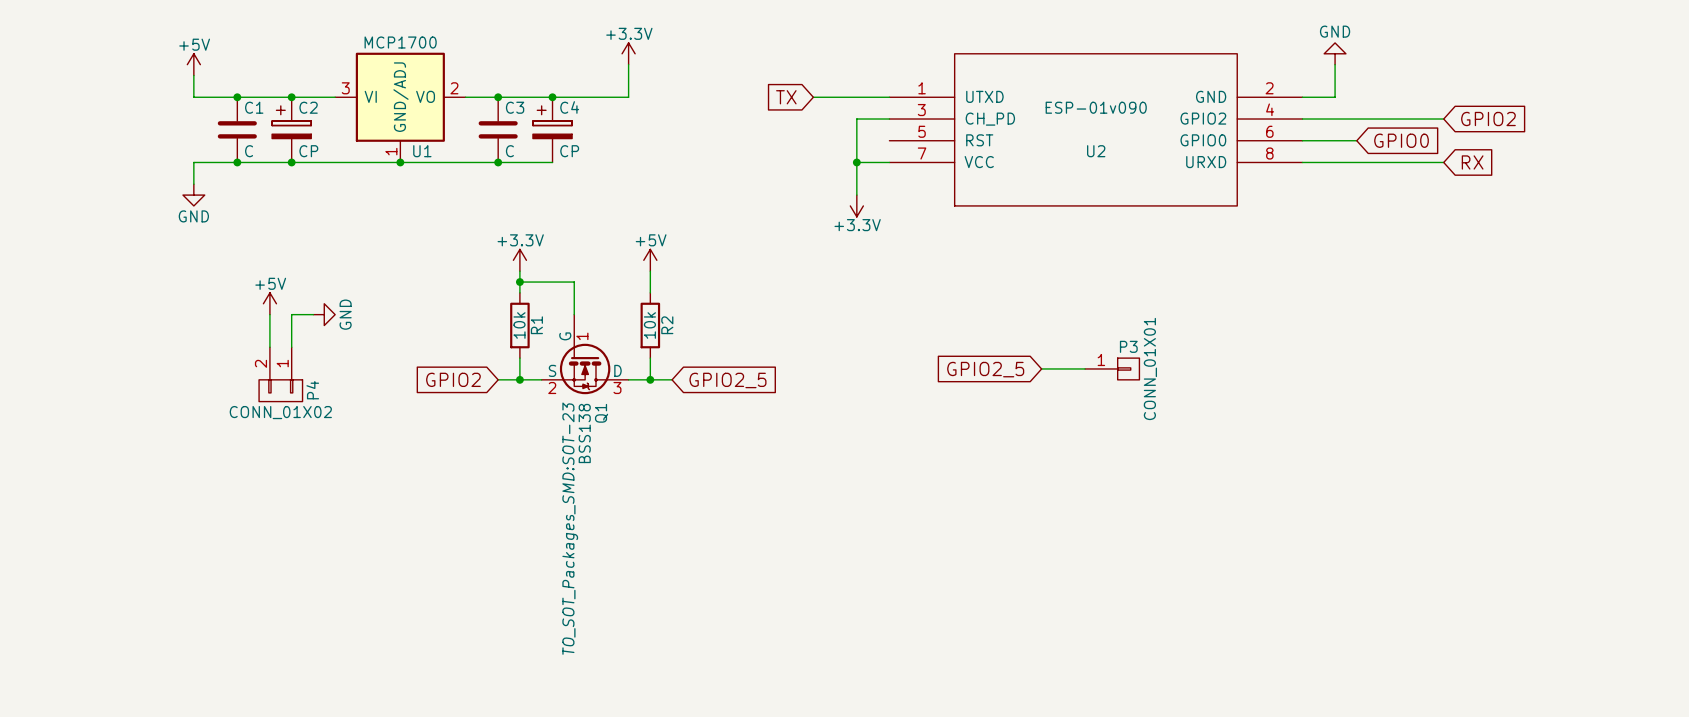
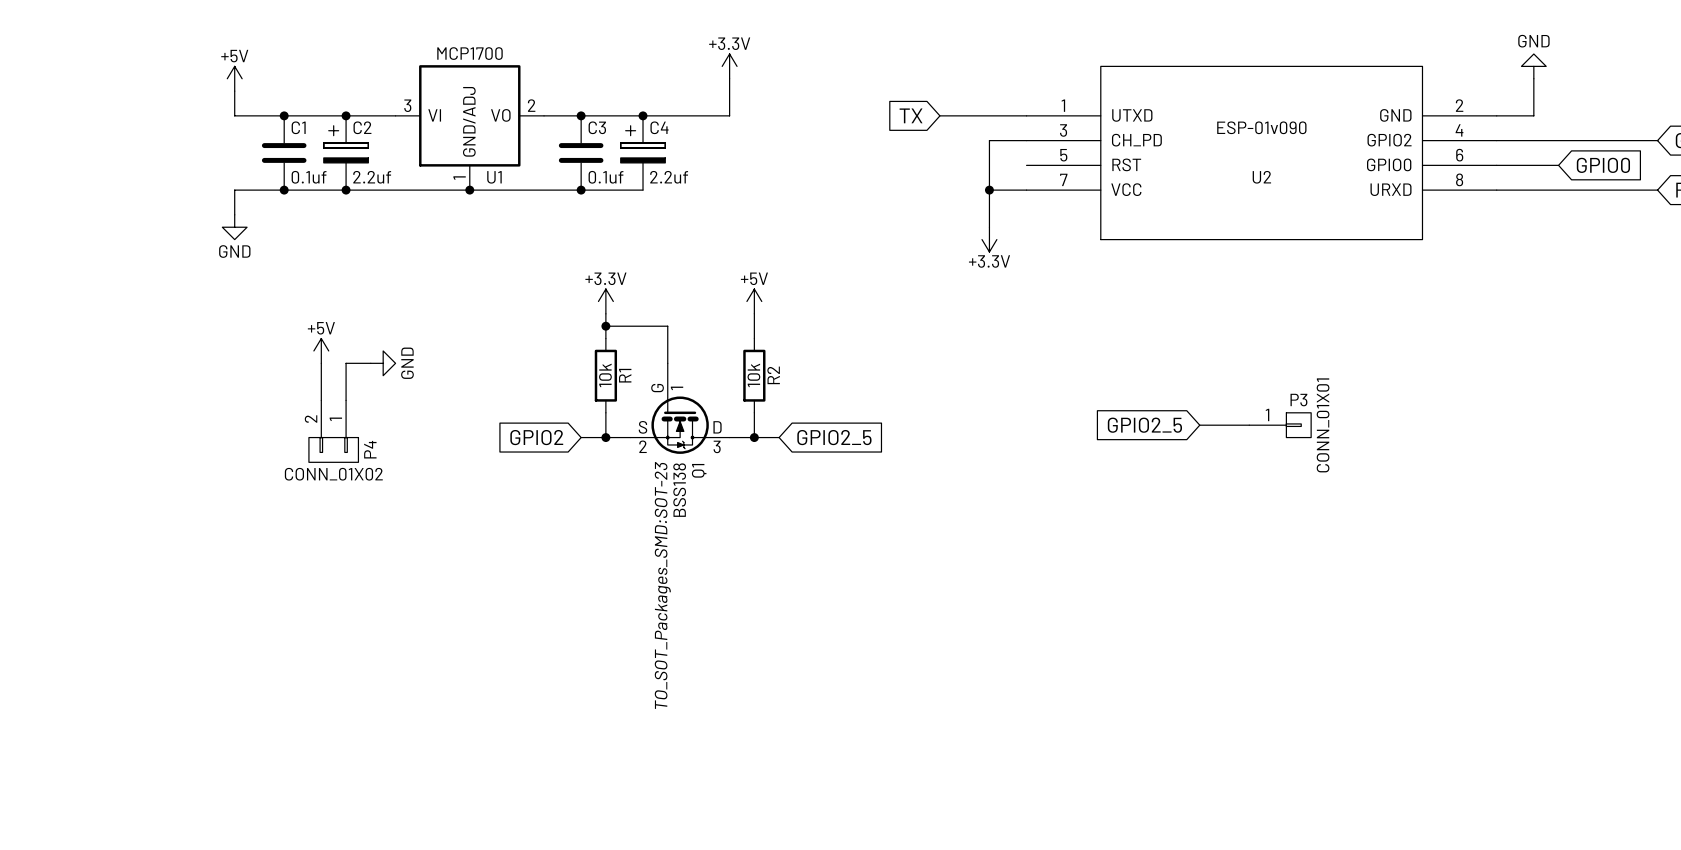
C1 value: C (249, 151) -> 0.1uf (309, 177)
C2 value: CP (308, 151) -> 2.2uf (372, 177)
C3 value: C (509, 151) -> 0.1uf (606, 177)
C4 value: CP (569, 151) -> 2.2uf (669, 177)

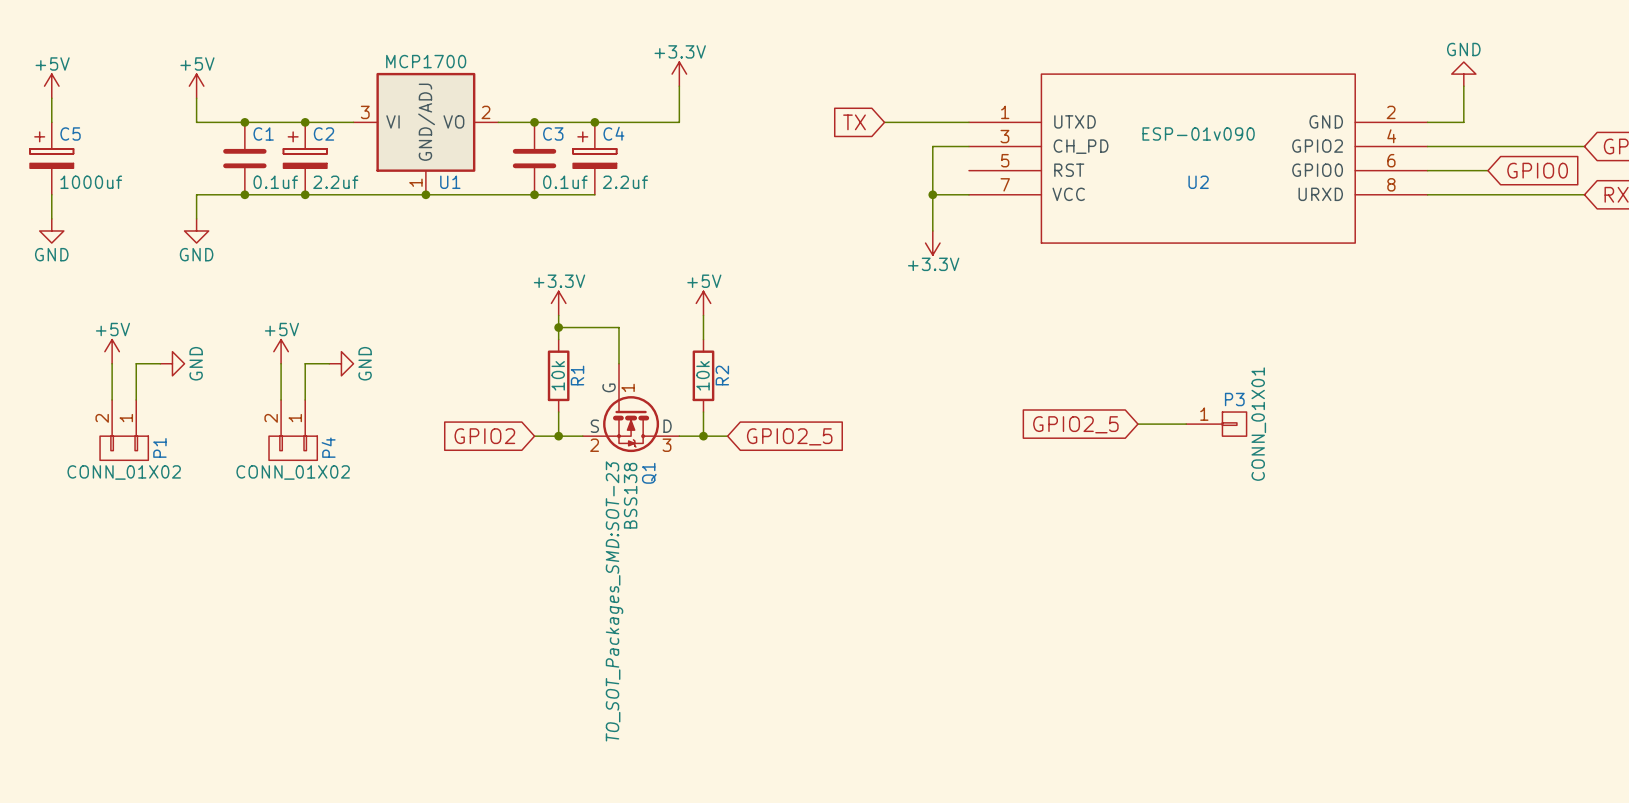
power symbol: none -> +5V (51, 86)
wire: none -> (51, 98) (51, 122)
C5: none -> 1000uf (51, 158)
wire: none -> (51, 194) (51, 218)
power symbol: none -> GND (51, 230)
power symbol: none -> +5V (112, 351)
wire: none -> (112, 363) (112, 399)
wire: none -> (160, 363) (136, 363) (136, 399)
power symbol: none -> GND (172, 363)
P1: none -> CONN_01X02 (124, 430)

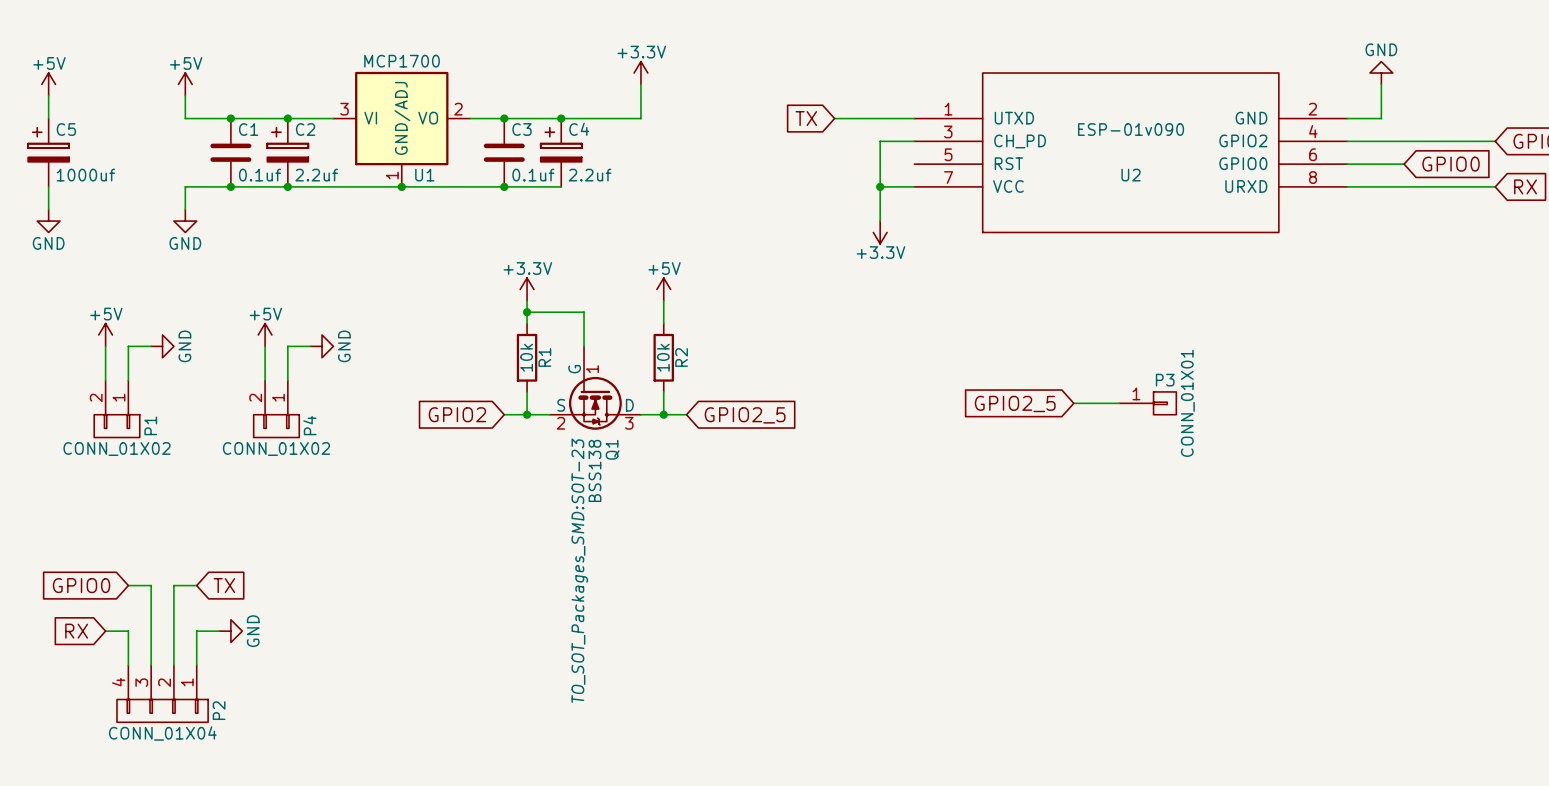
global label: none -> GPIO0 (81, 585)
wire: none -> (128, 585) (151, 585) (151, 665)
wire: none -> (196, 585) (173, 585) (173, 665)
global label: none -> TX (224, 585)
global label: none -> RX (76, 631)
wire: none -> (105, 631) (128, 631) (128, 665)
wire: none -> (219, 631) (196, 631) (196, 665)
power symbol: none -> GND (230, 631)
P2: none -> CONN_01X04 (162, 693)

